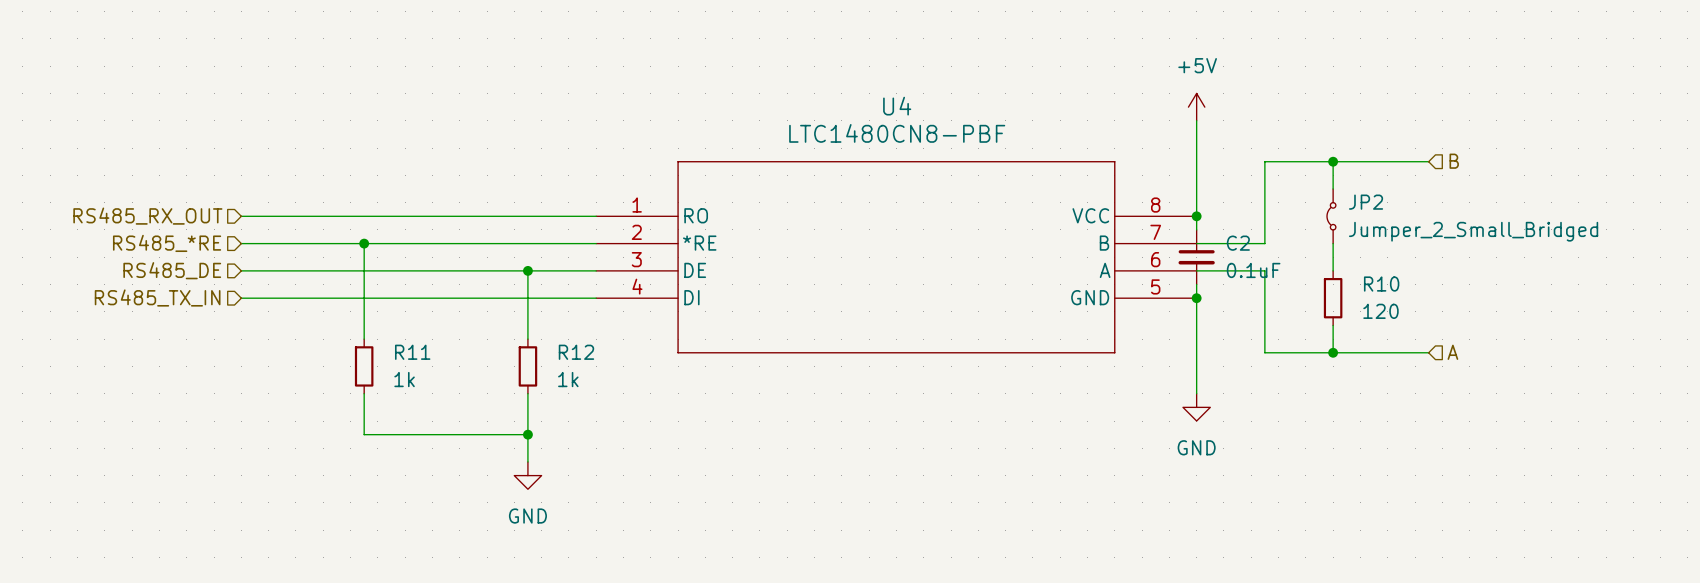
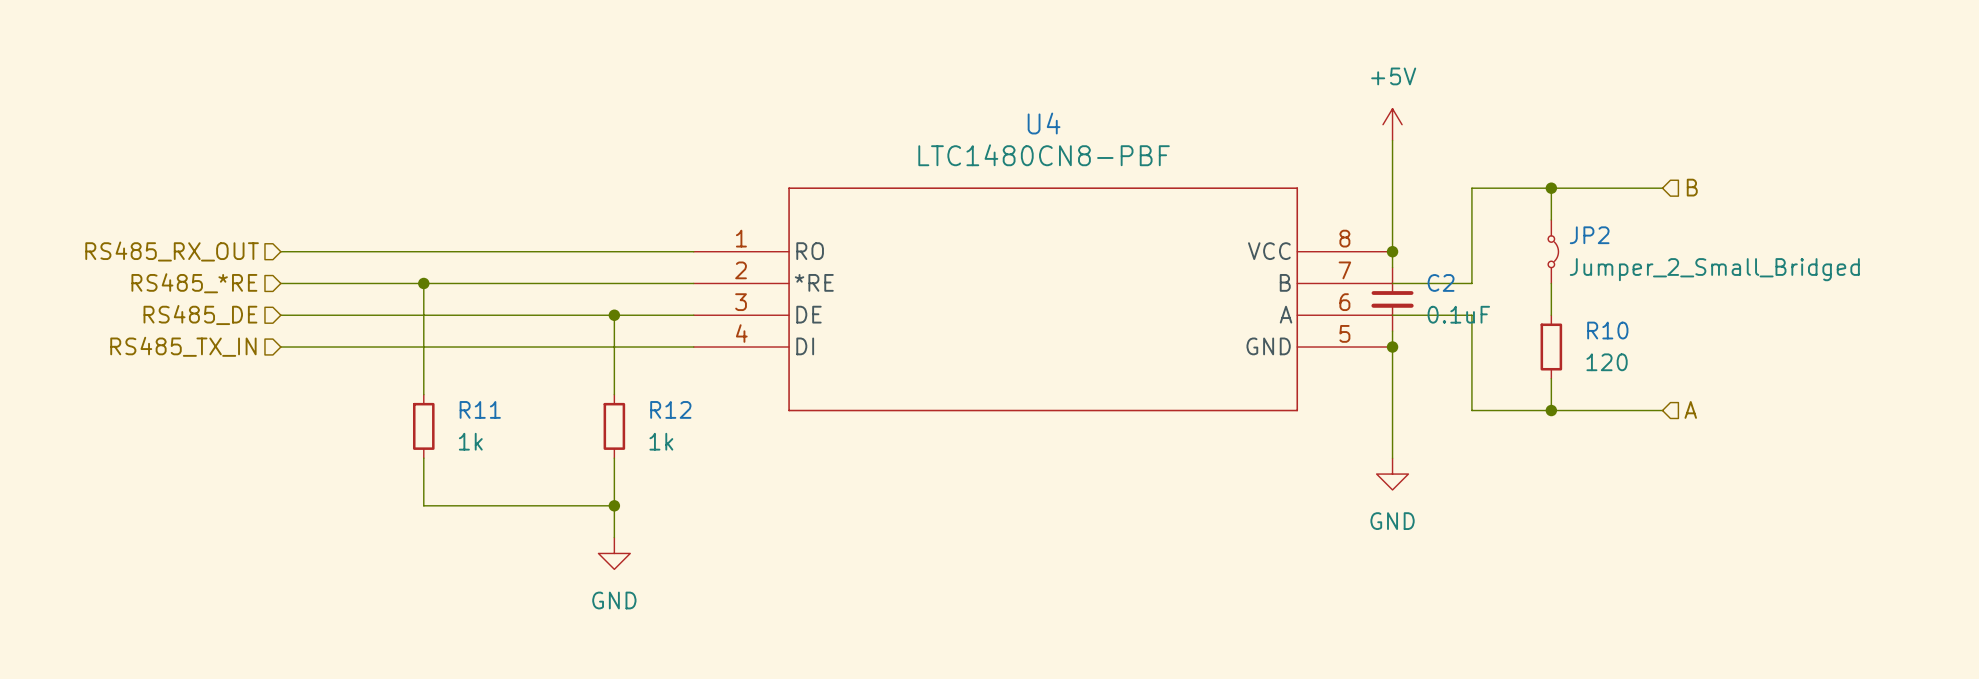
JP2 rotation: 0° (1331, 216) -> 180° (1553, 251)

